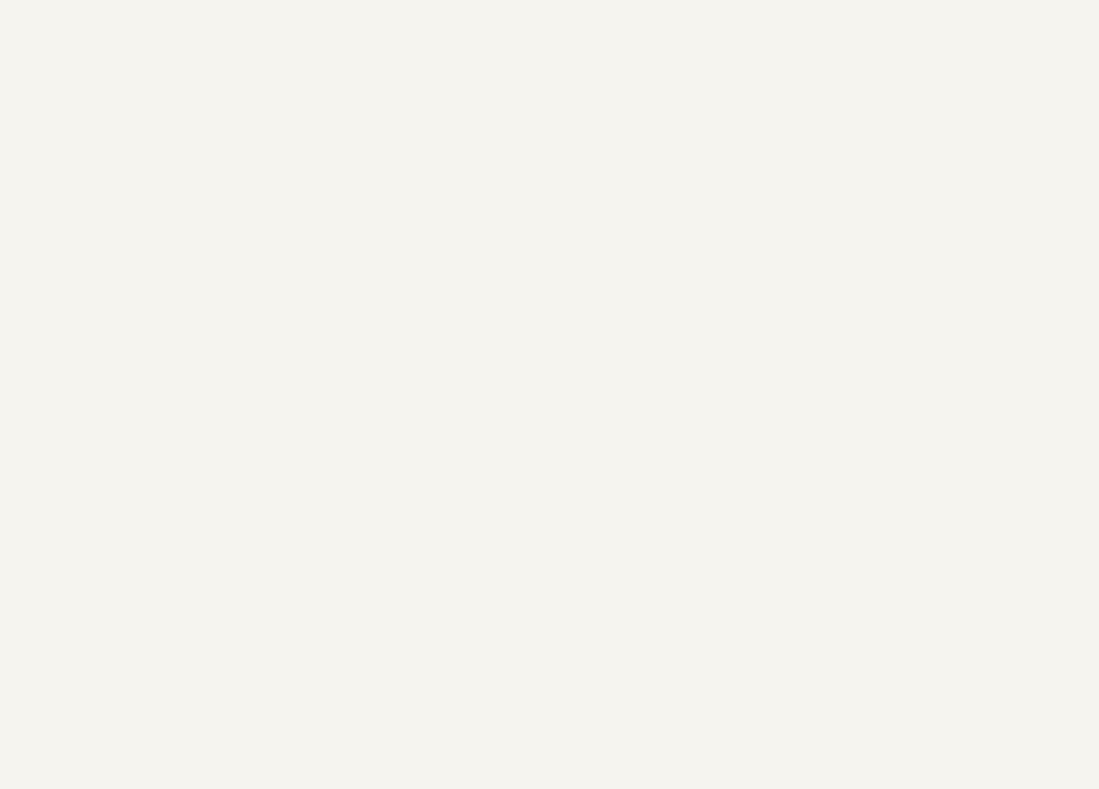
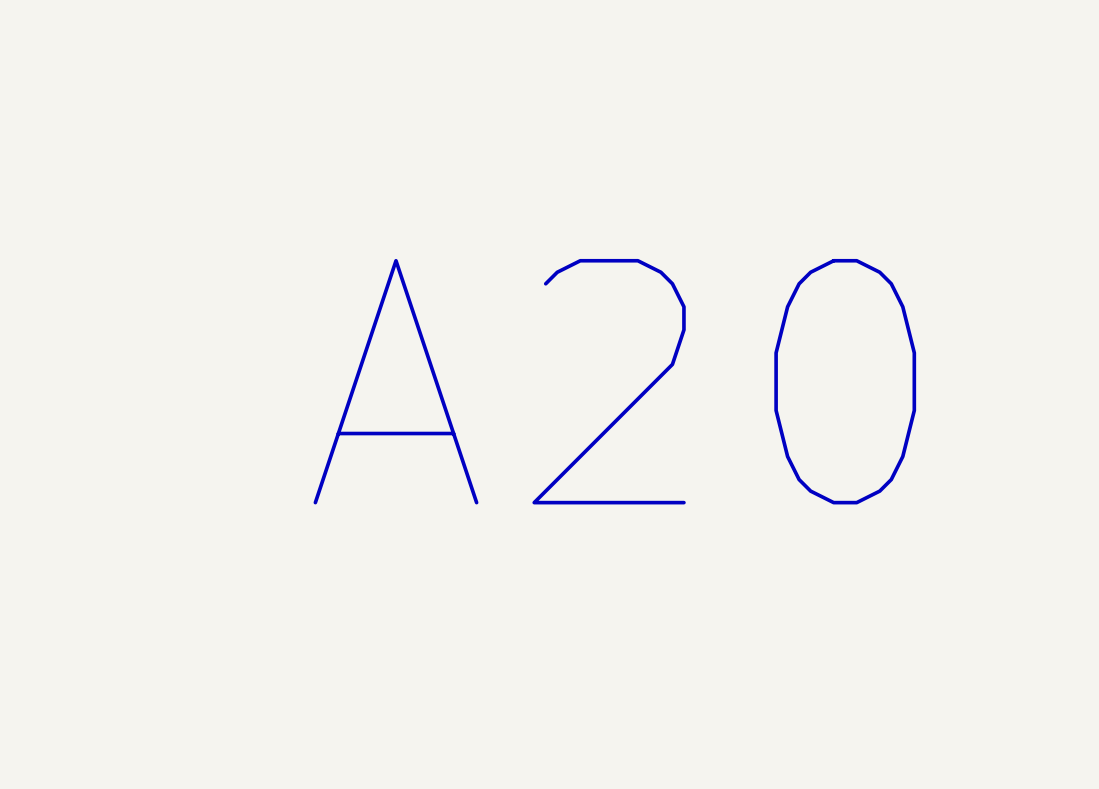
text: none -> A20 (614, 381)

